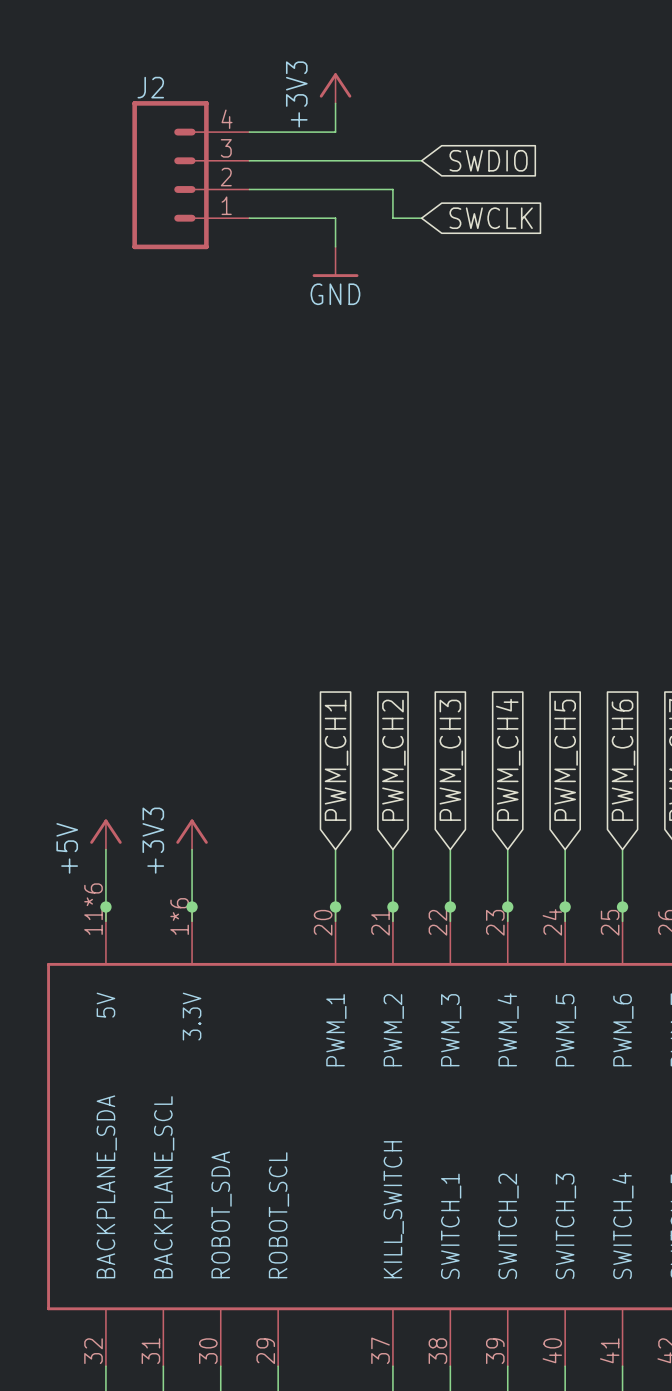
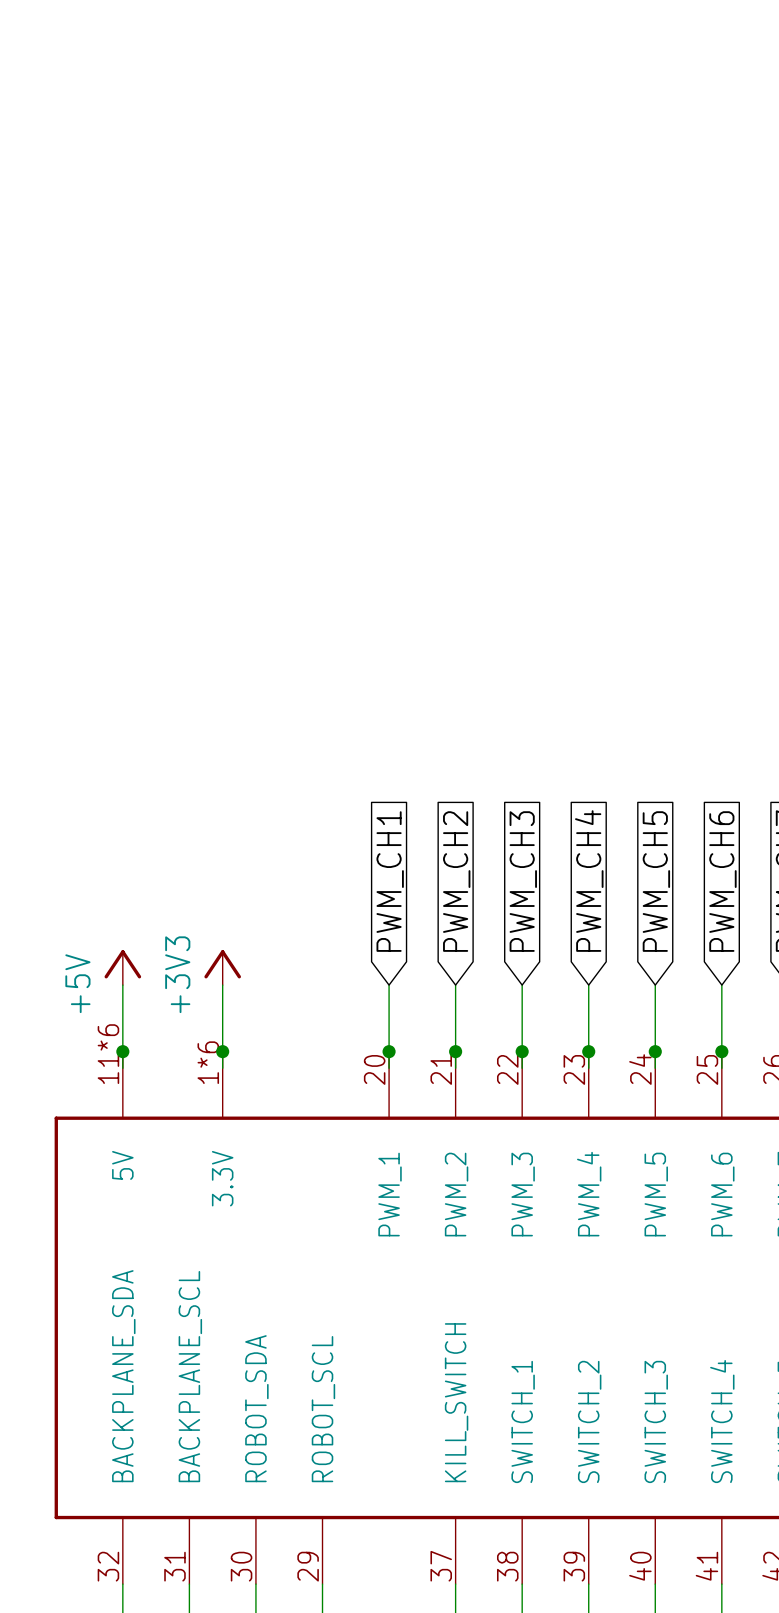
power symbol: +3V3 (335, 88) -> none
wire: (335, 103) (335, 132) (249, 132) -> none
wire: (249, 160) (421, 160) -> none
global label: SWDIO (488, 160) -> none
J2: (190, 175) -> none
wire: (249, 189) (392, 189) (392, 218) (421, 218) -> none
wire: (249, 218) (335, 218) (335, 246) -> none
global label: SWCLK (491, 218) -> none
power symbol: GND (335, 261) -> none

